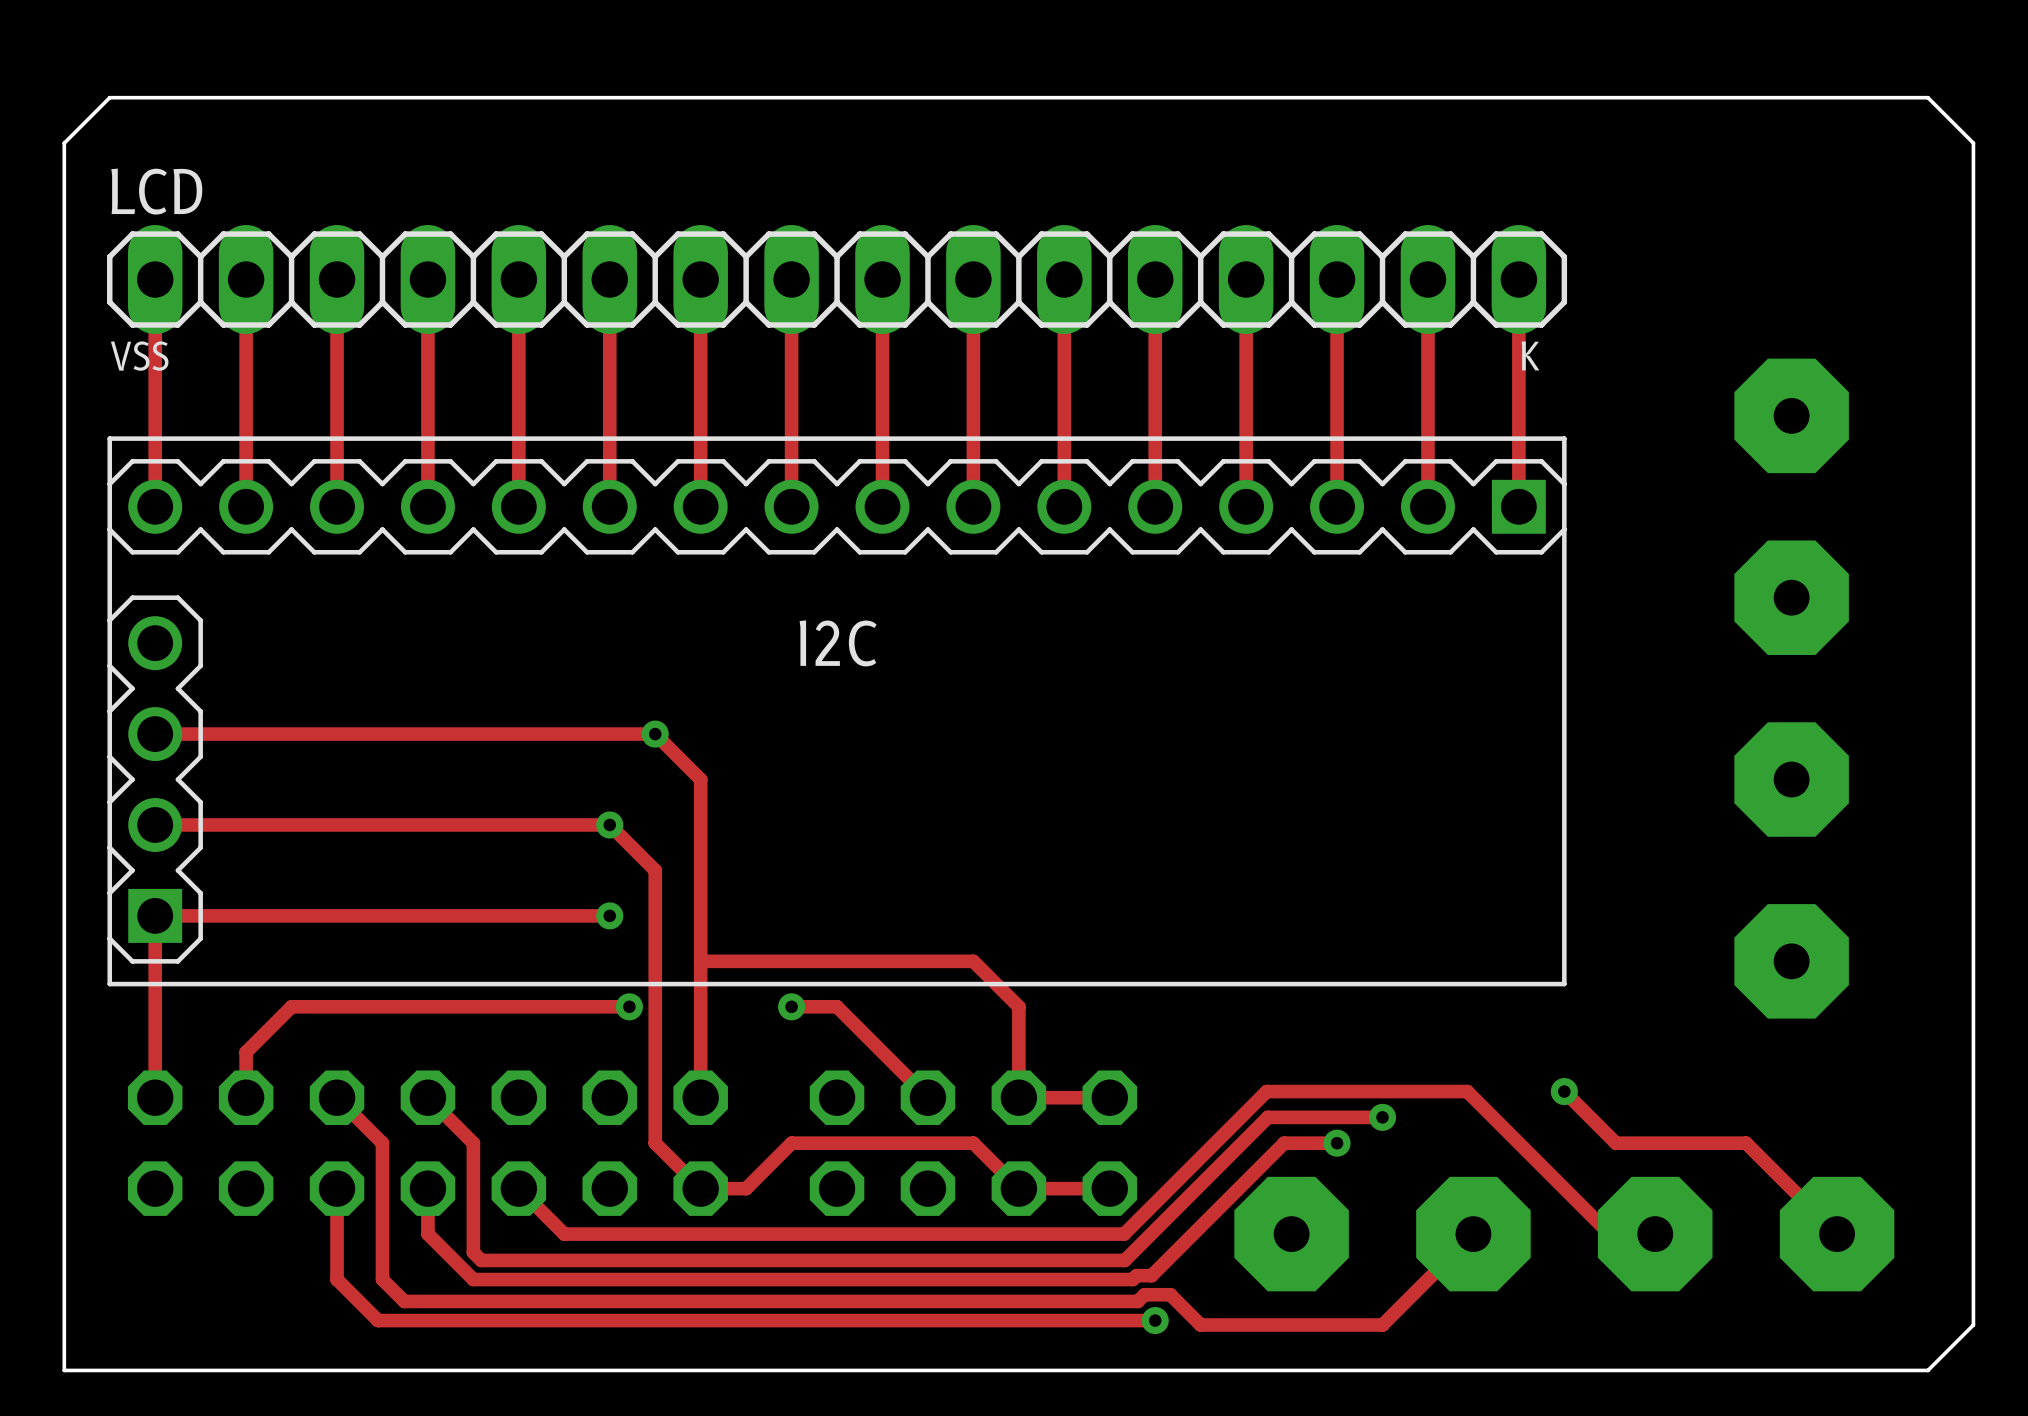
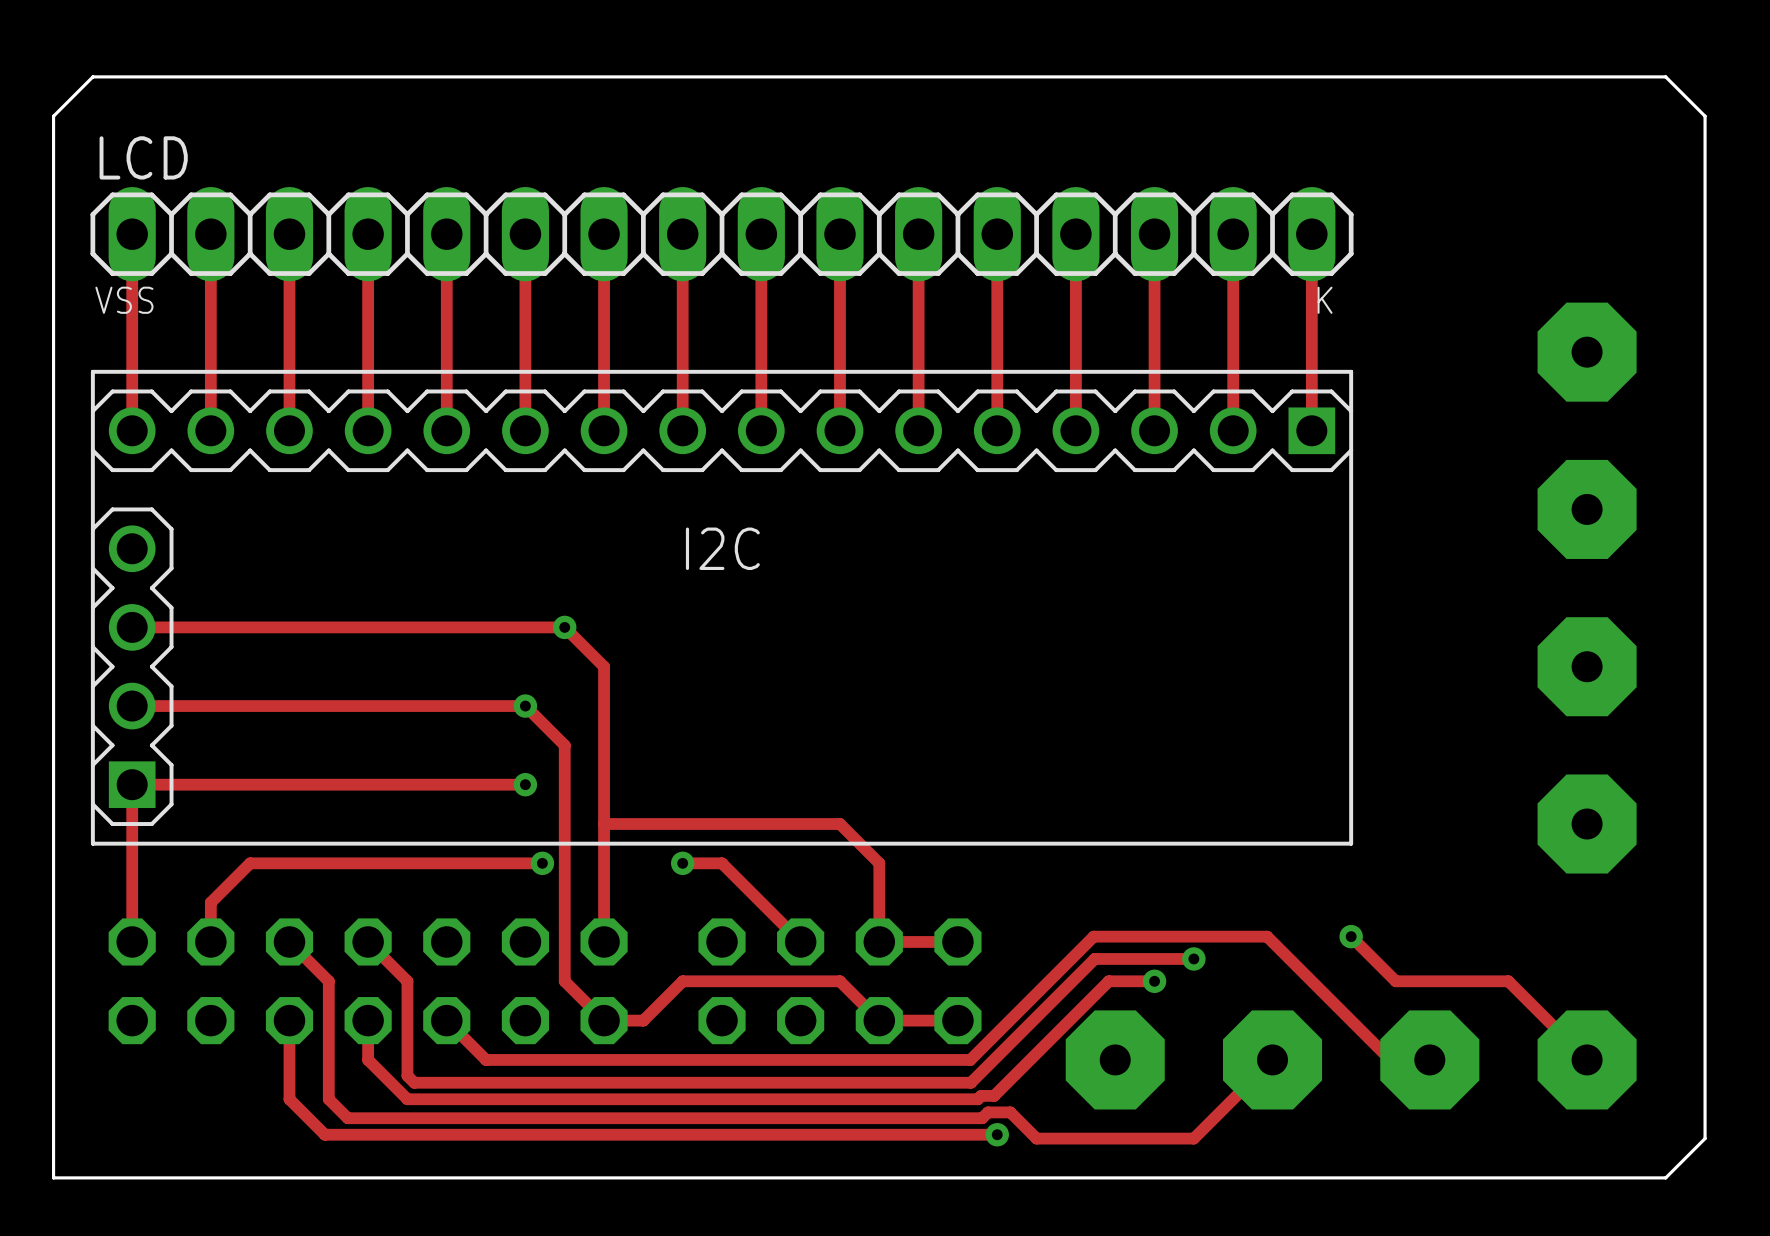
part position: (1791, 506) -> (1587, 430)
part position: (1791, 870) -> (1587, 745)

